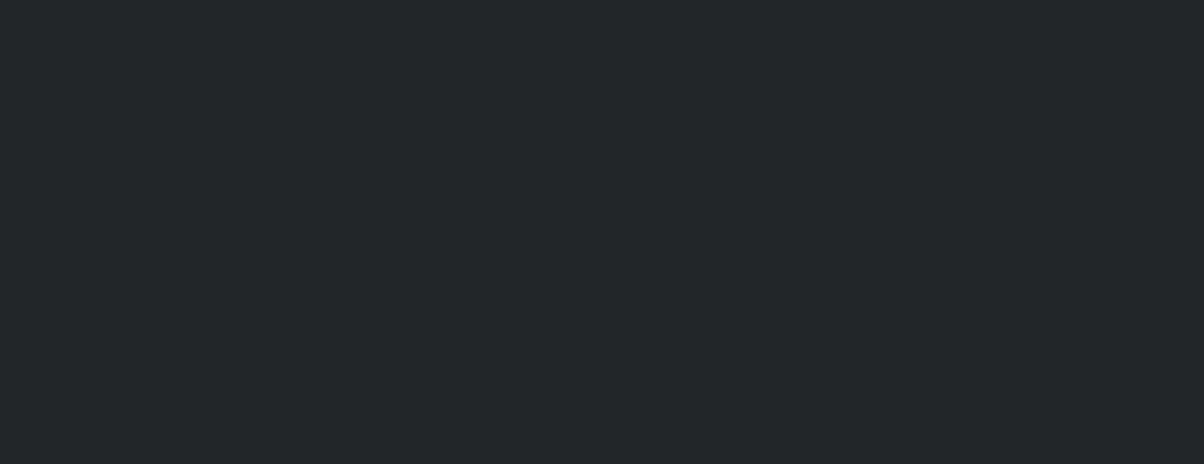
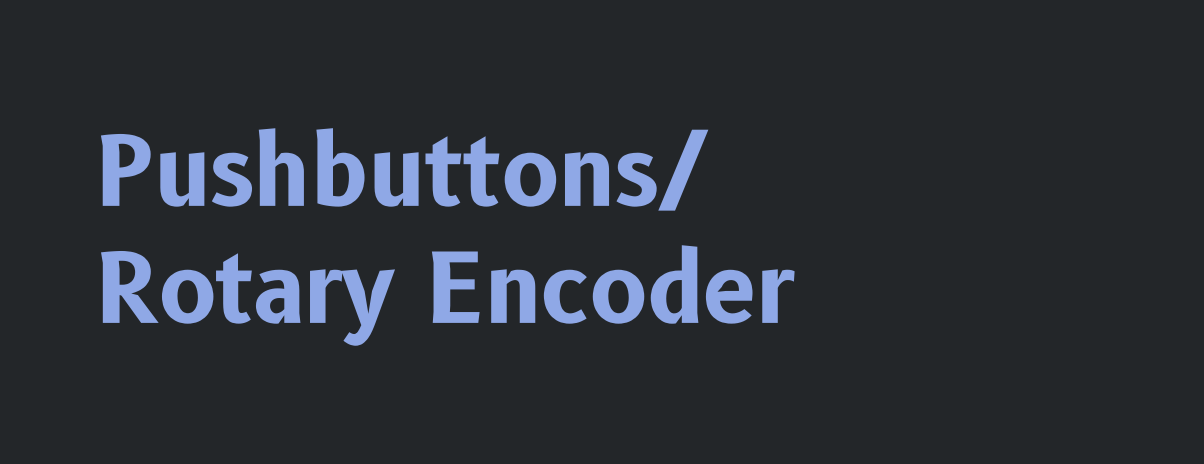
text: none -> Pushbuttons/ (404, 169)
text: none -> Rotary Encoder (447, 295)

